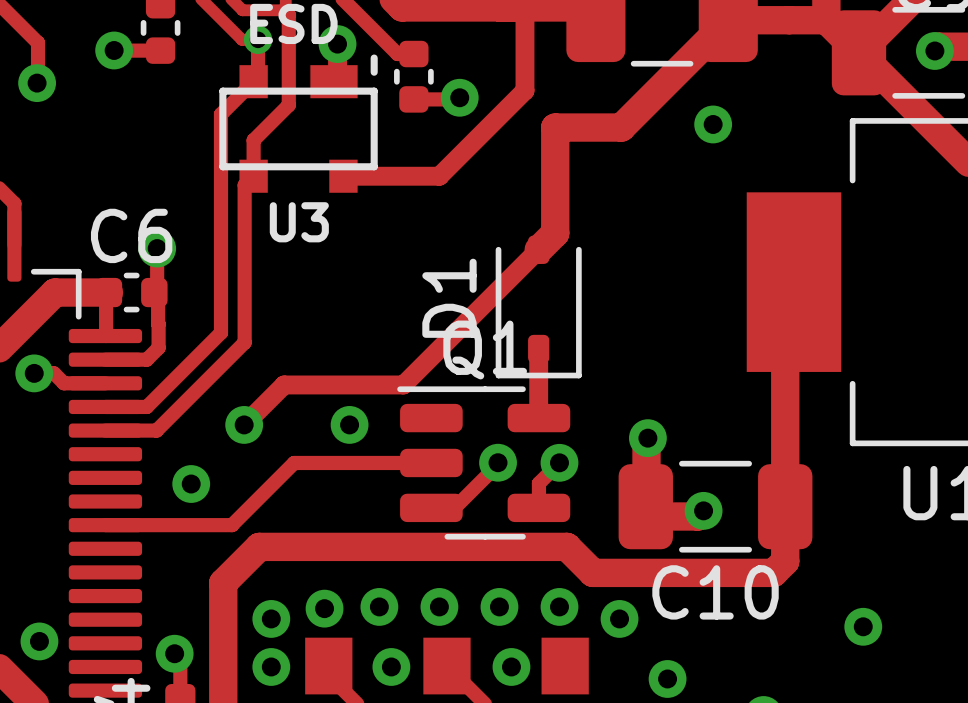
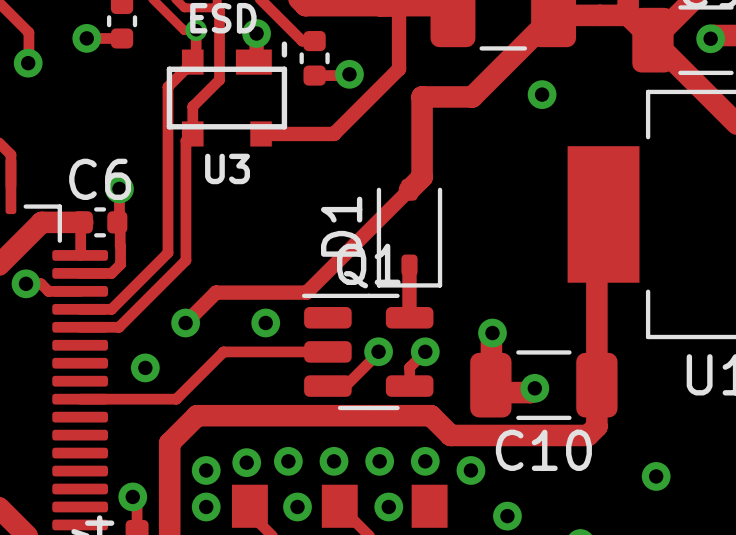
via: (39, 641) -> none

